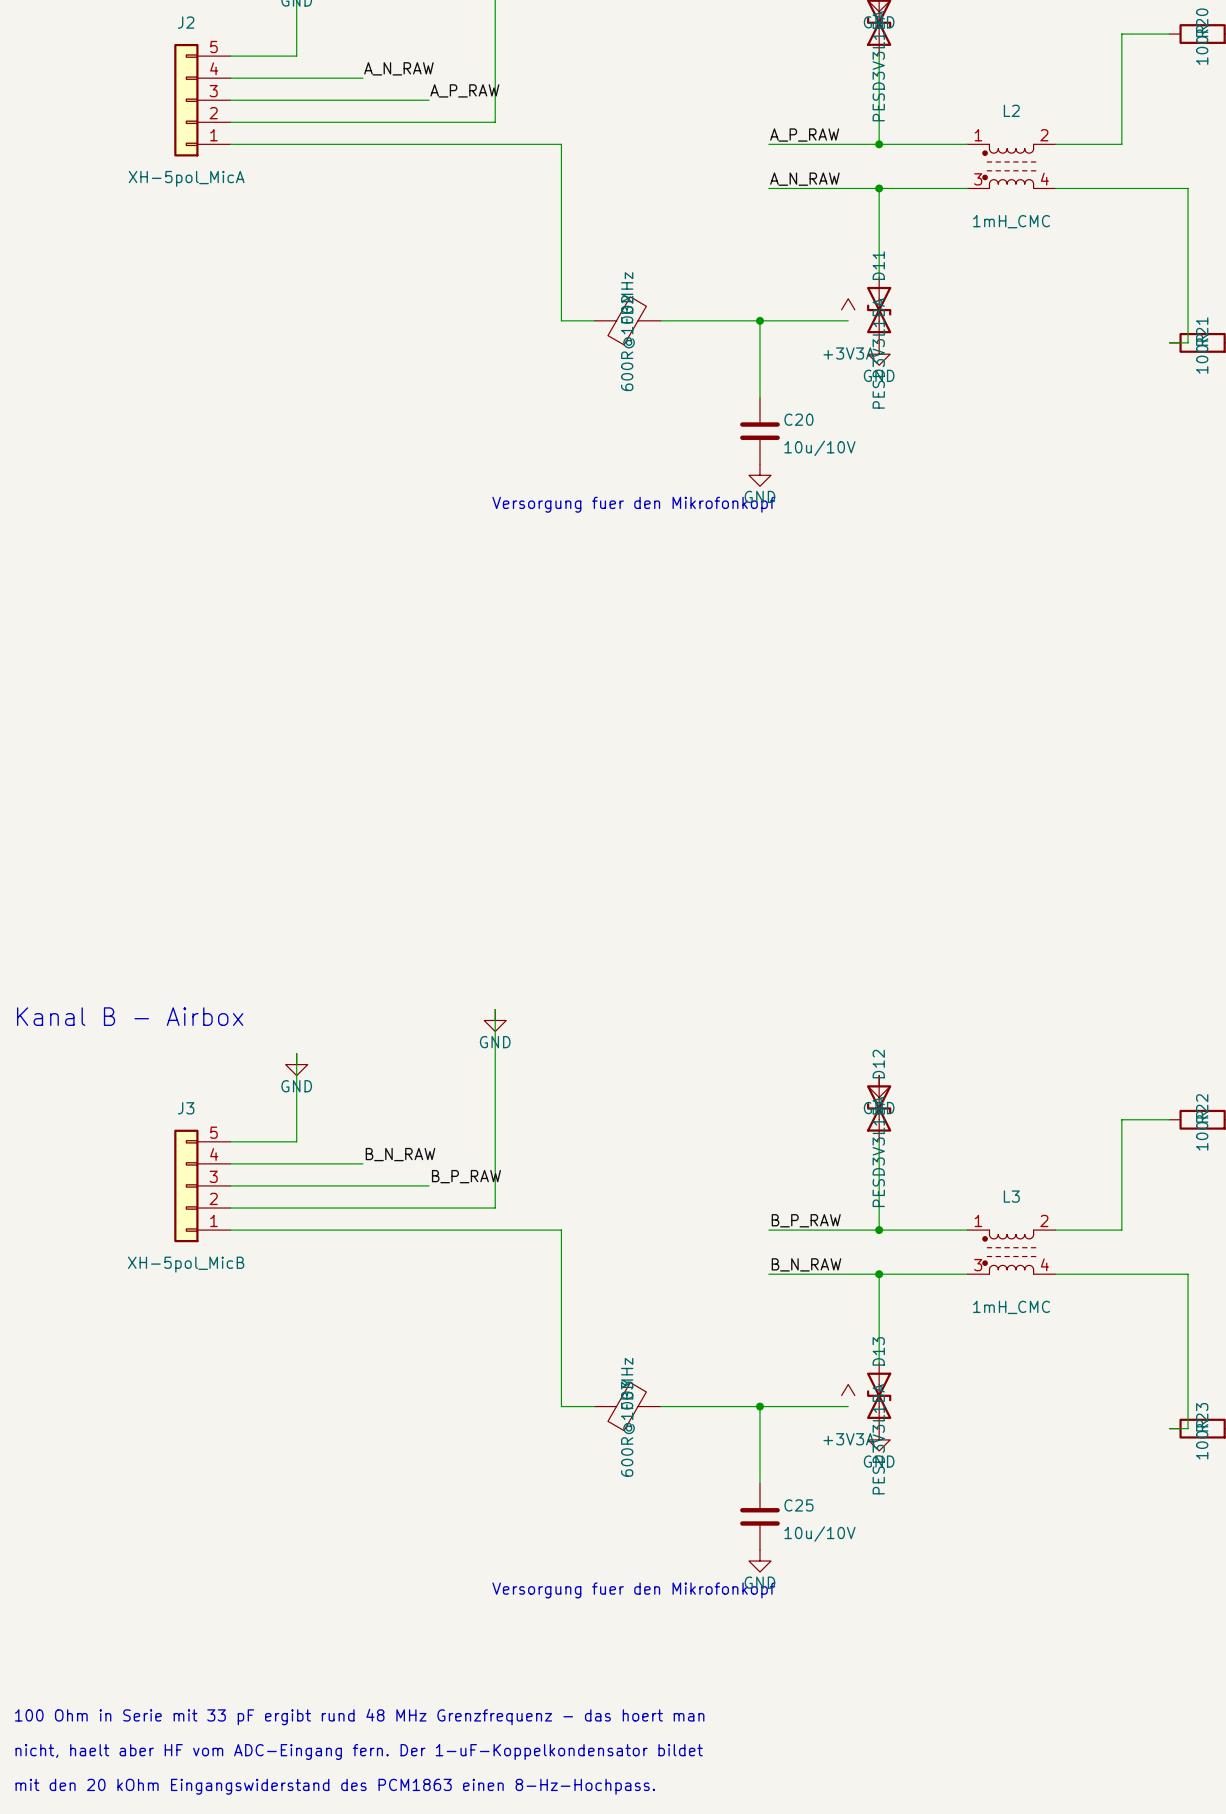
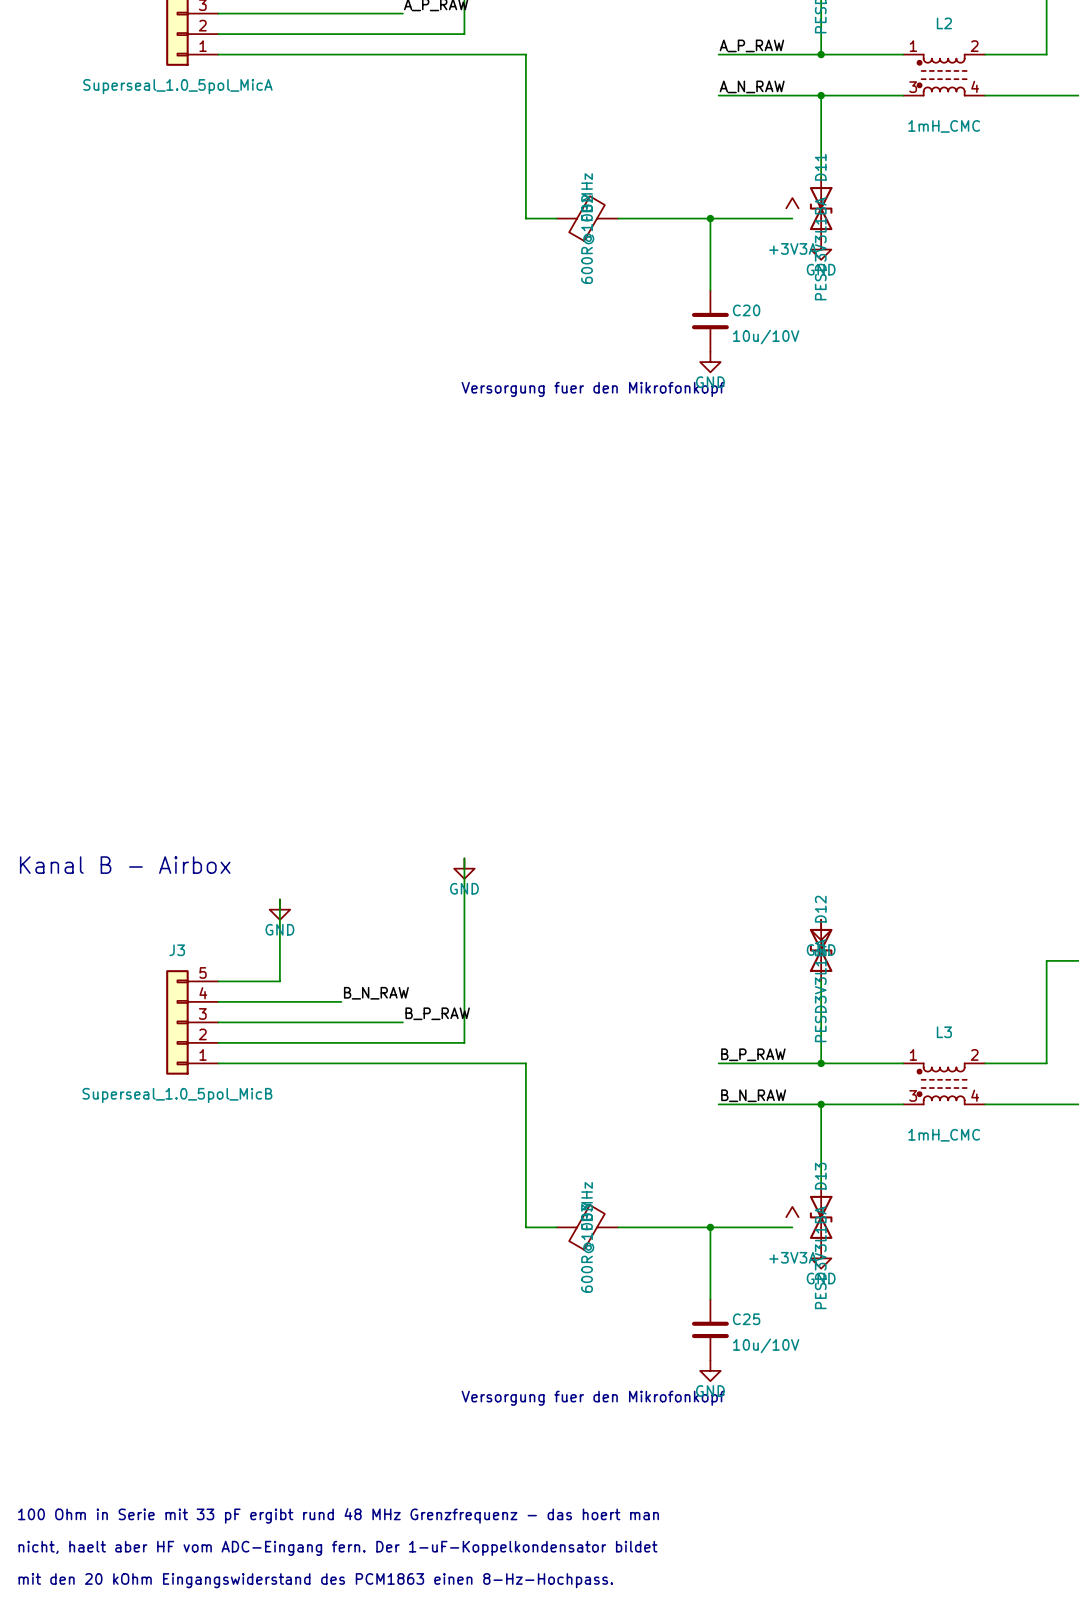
J2 value: XH-5pol_MicA (186, 178) -> Superseal_1.0_5pol_MicA (177, 86)
J3 value: XH-5pol_MicB (186, 1264) -> Superseal_1.0_5pol_MicB (177, 1095)

